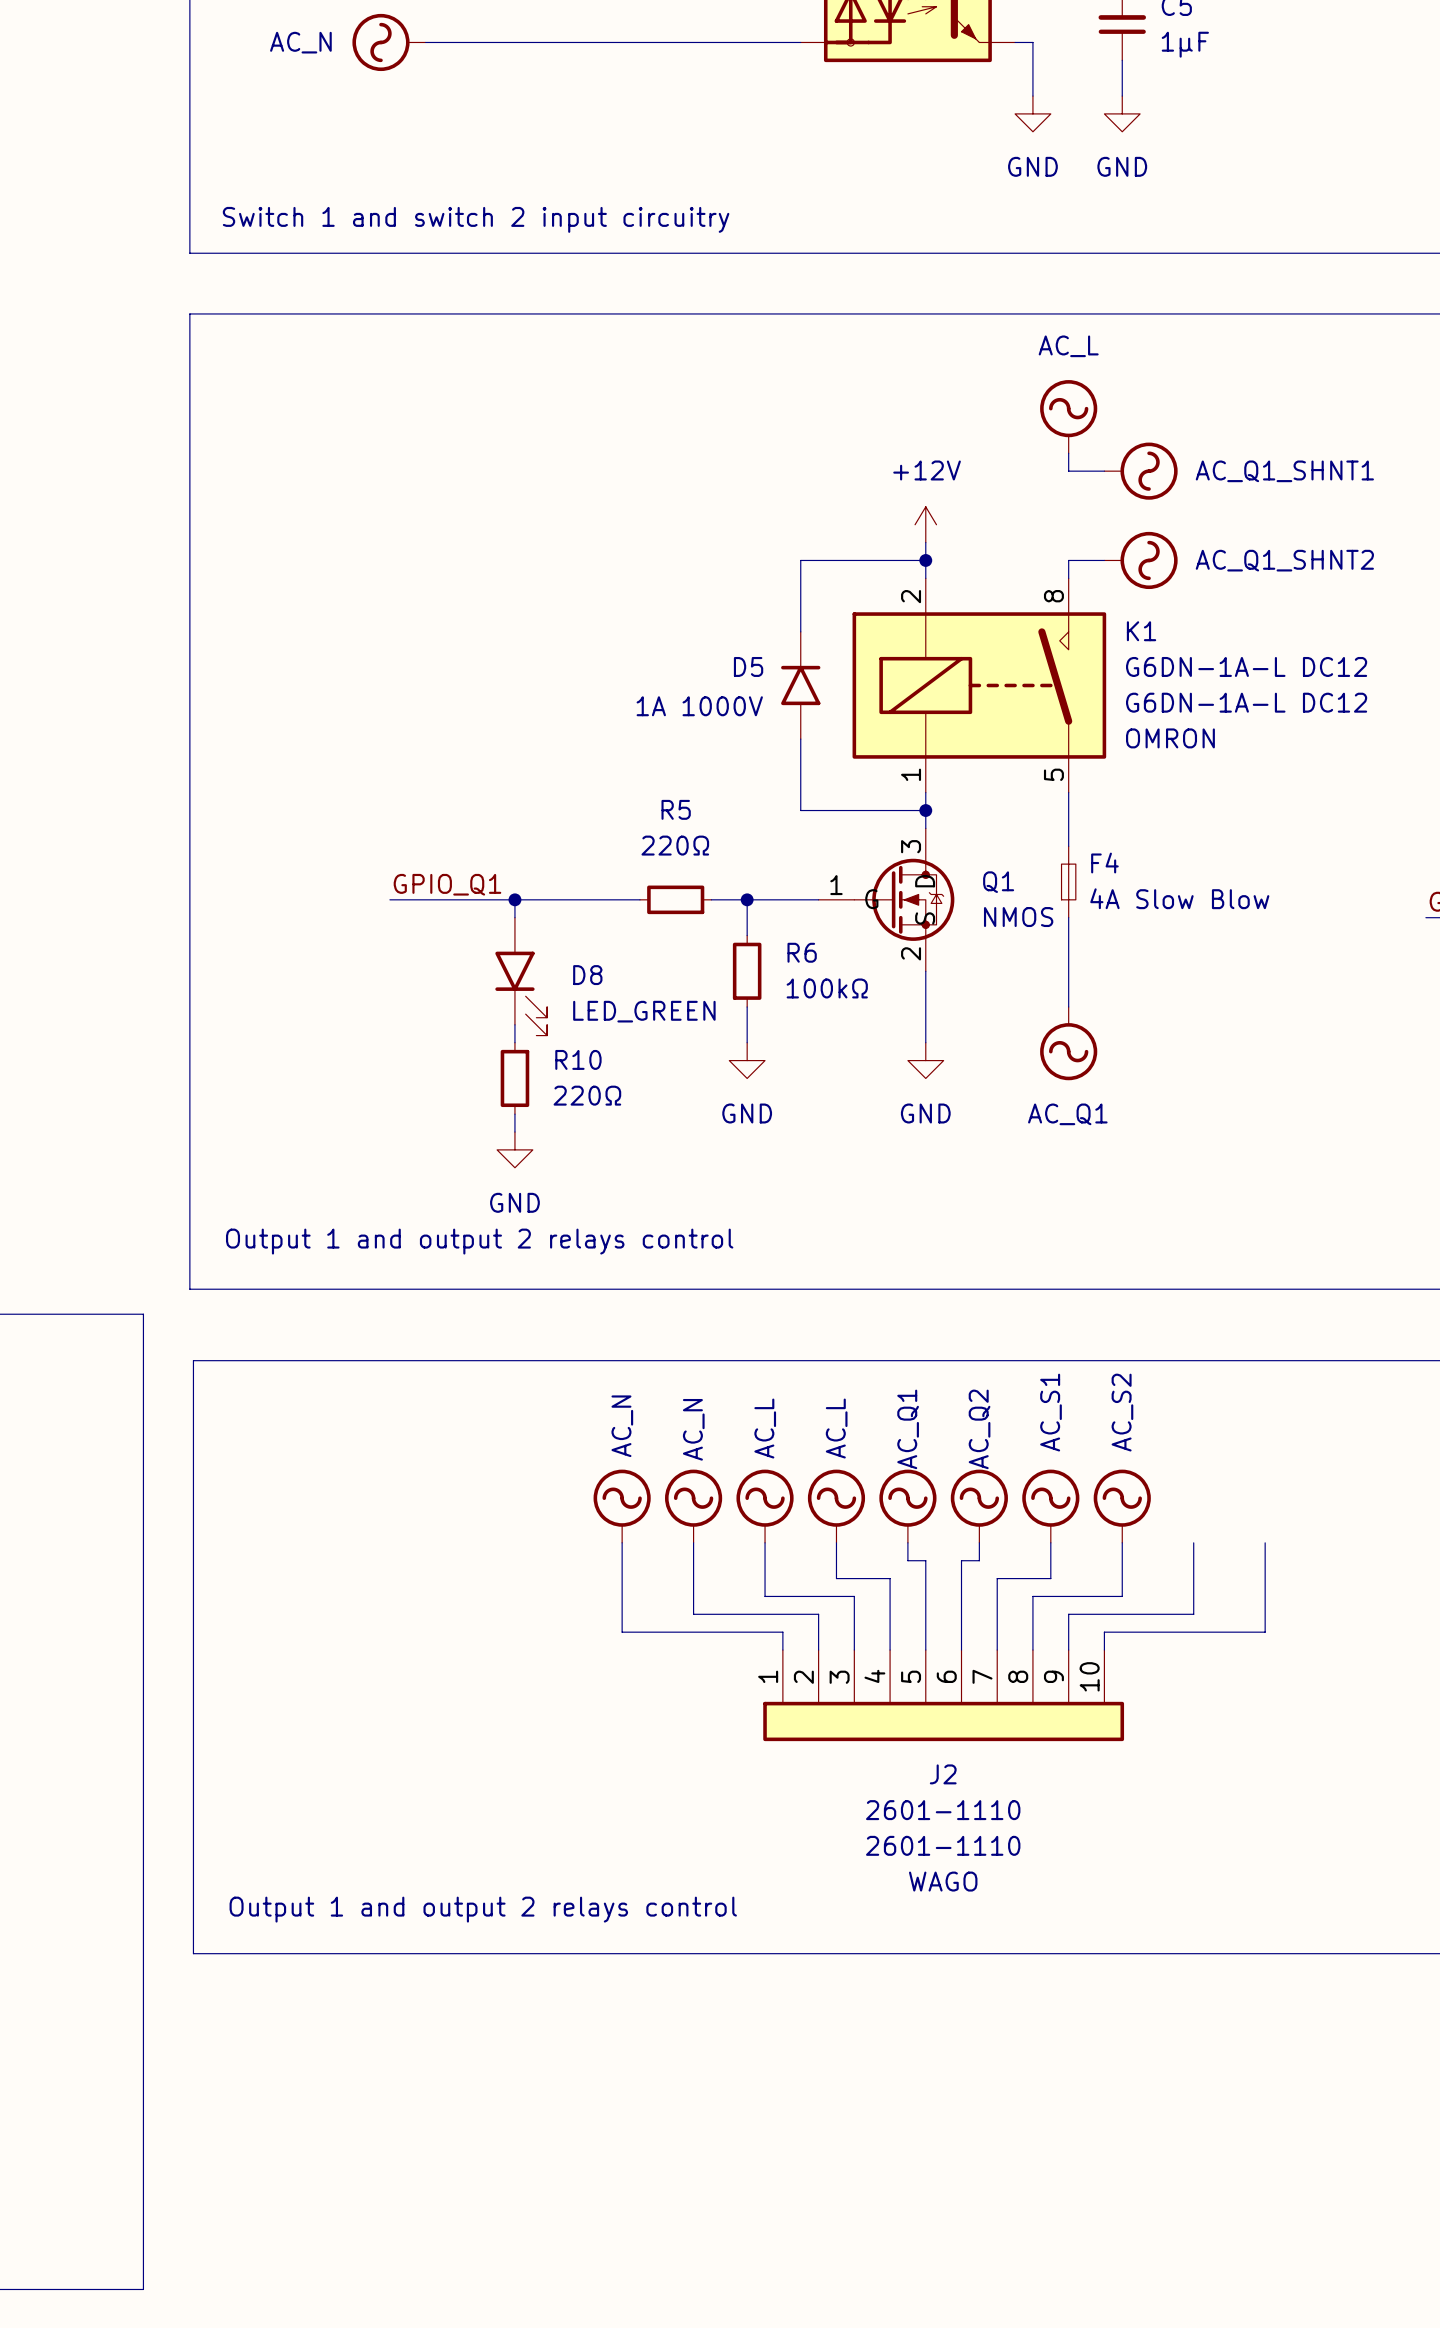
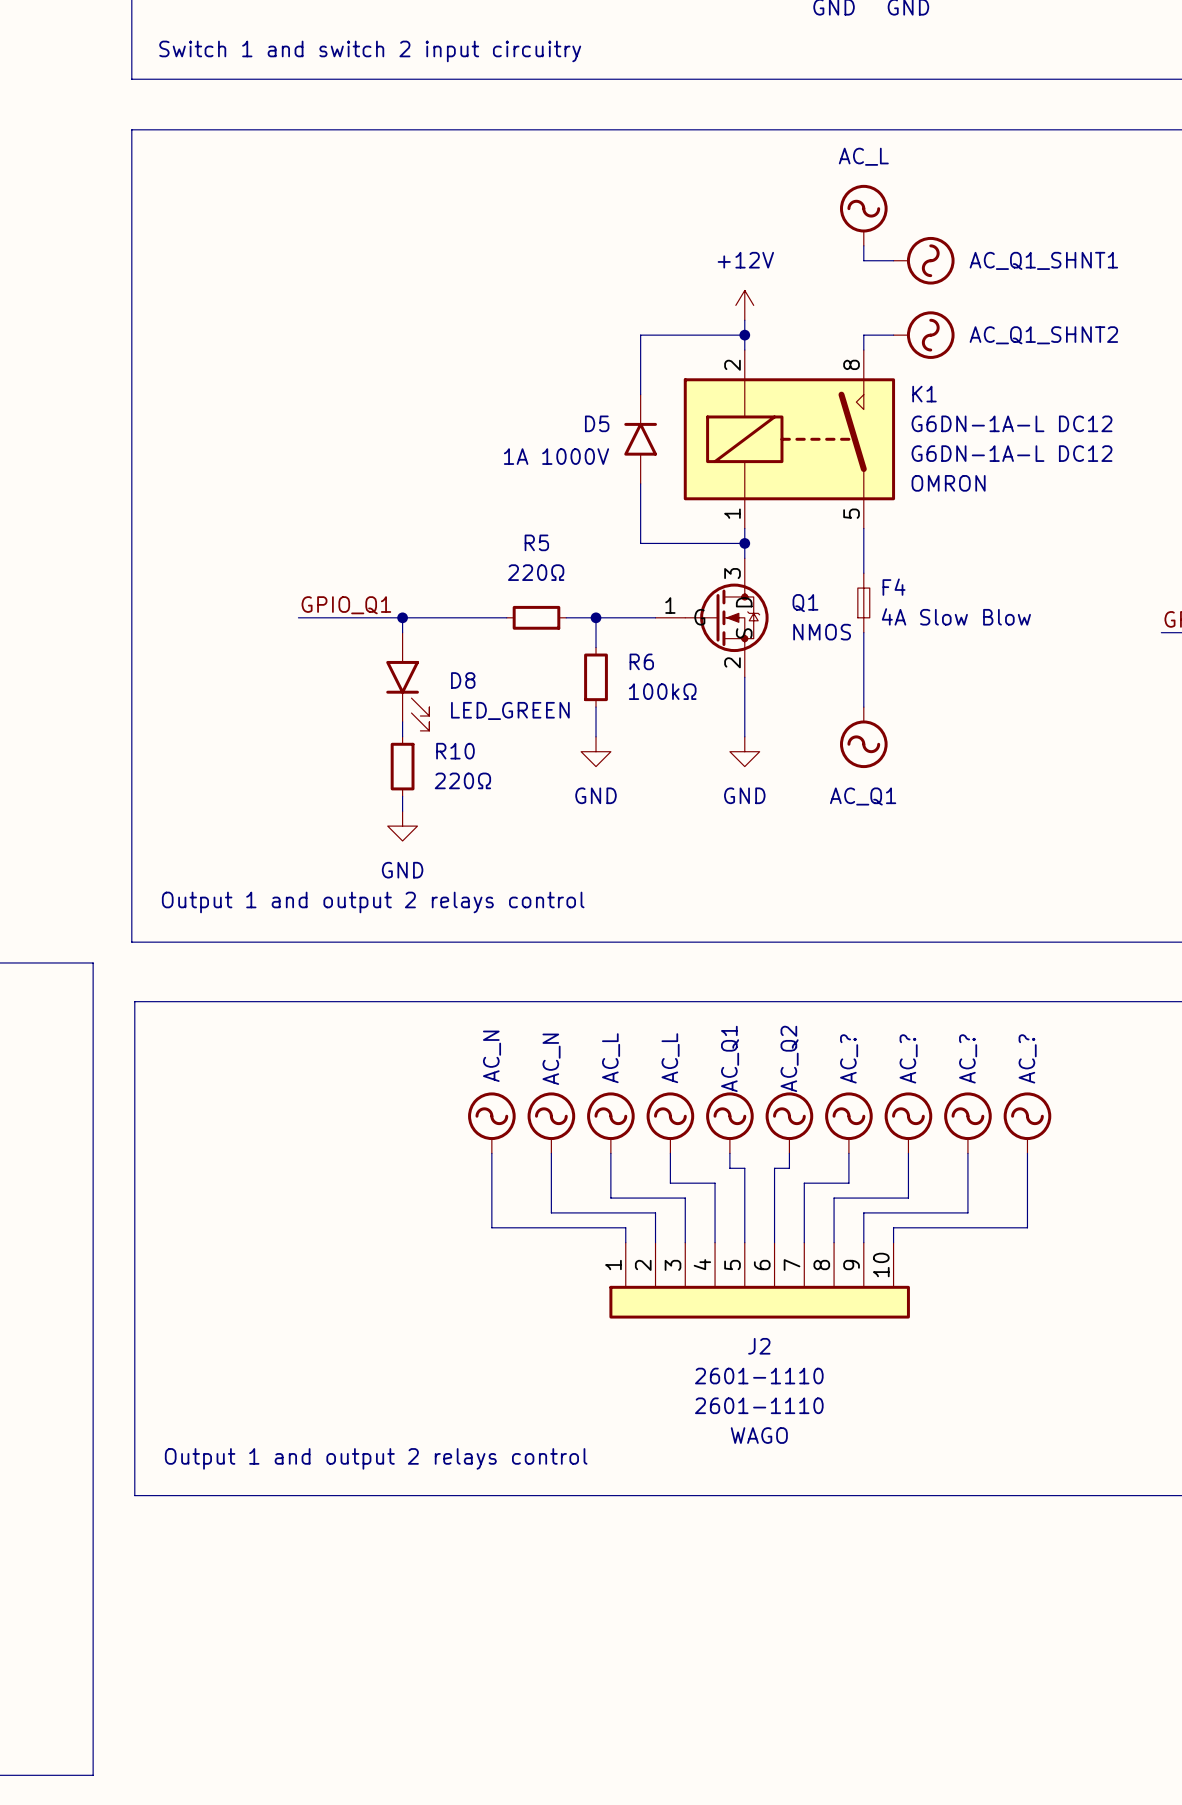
power symbol: AC_S1 (1050, 1506) -> AC_? (848, 1122)
power symbol: AC_S2 (1122, 1506) -> AC_? (908, 1122)
power symbol: none -> AC_? (967, 1122)
power symbol: none -> AC_? (1027, 1122)

